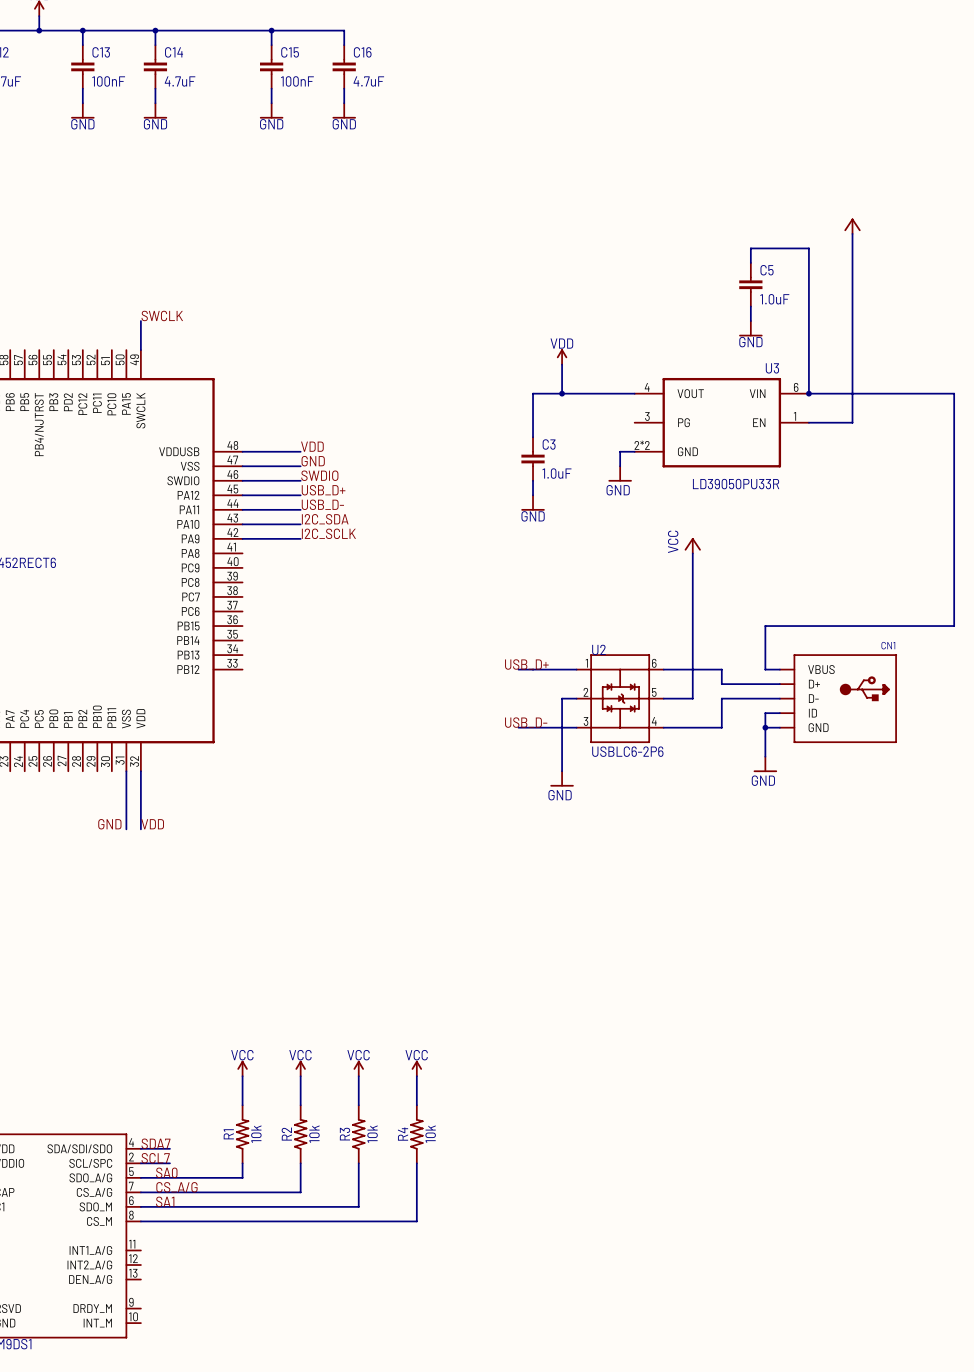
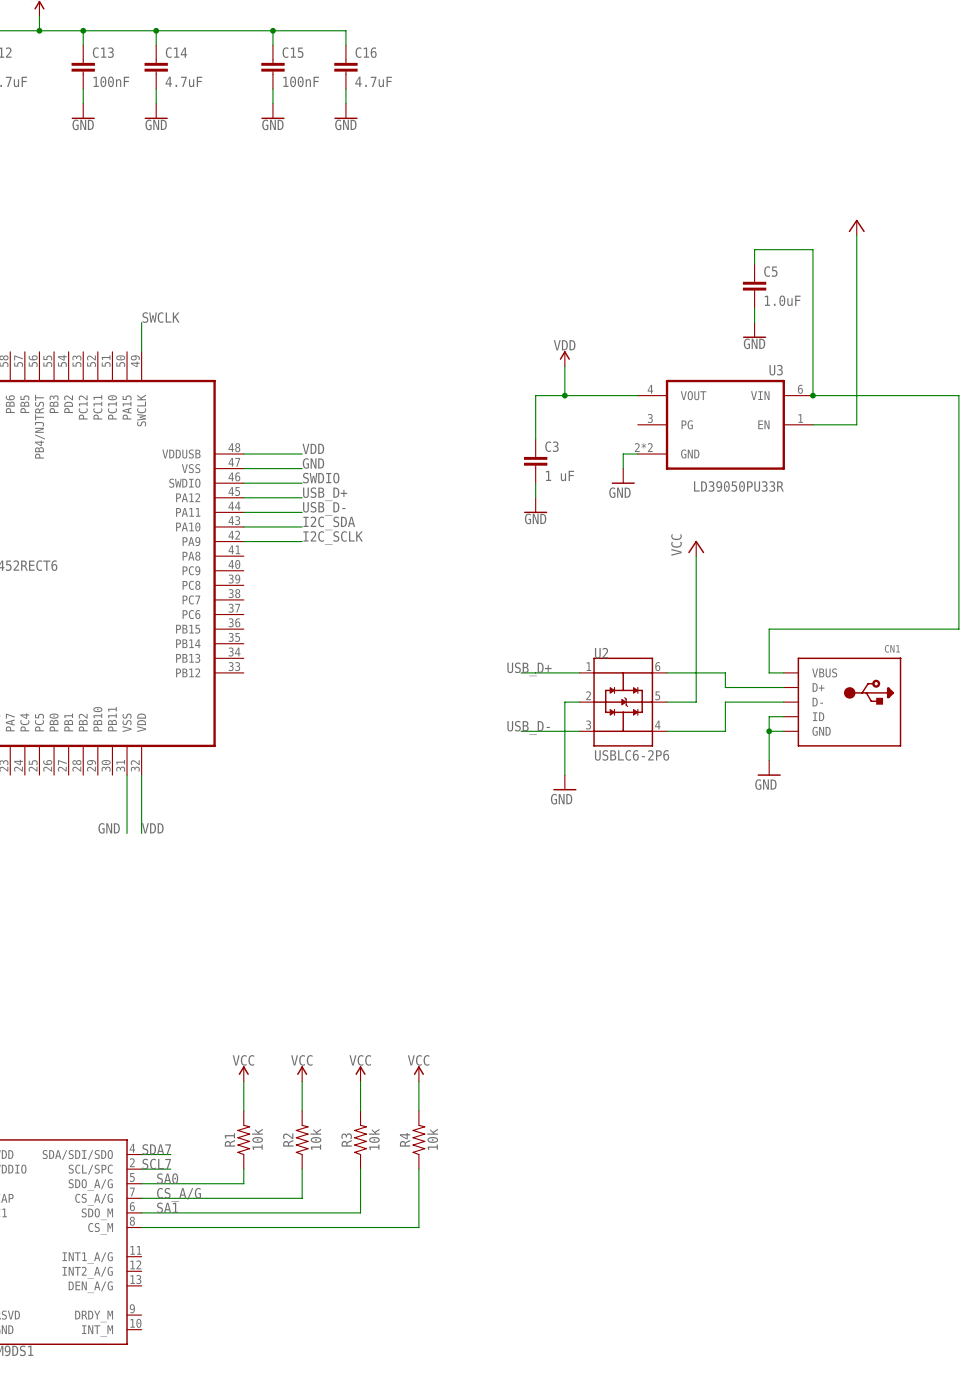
C3 value: 1.0uF (556, 473) -> 1 uF (559, 475)

